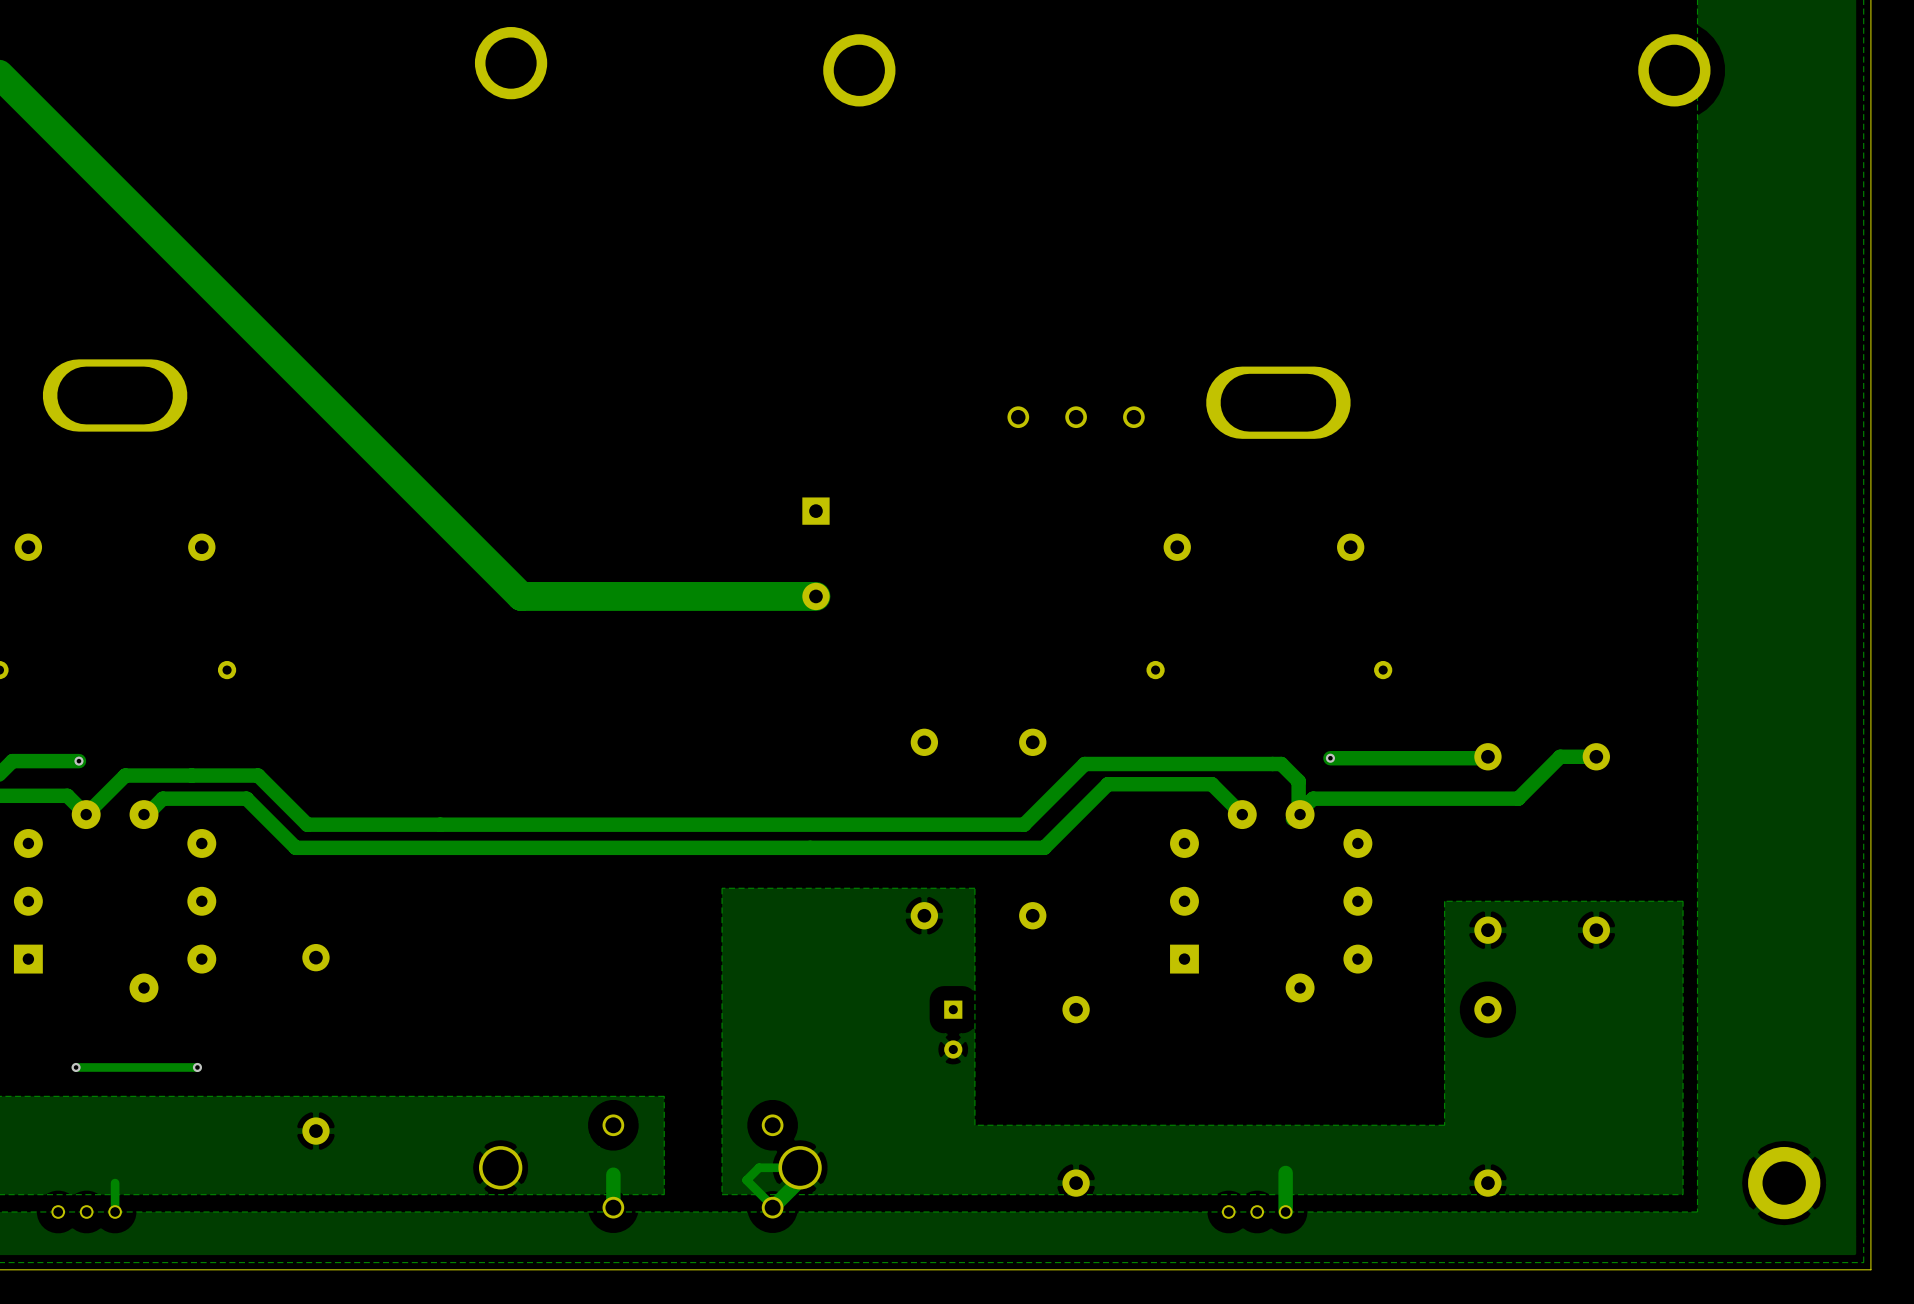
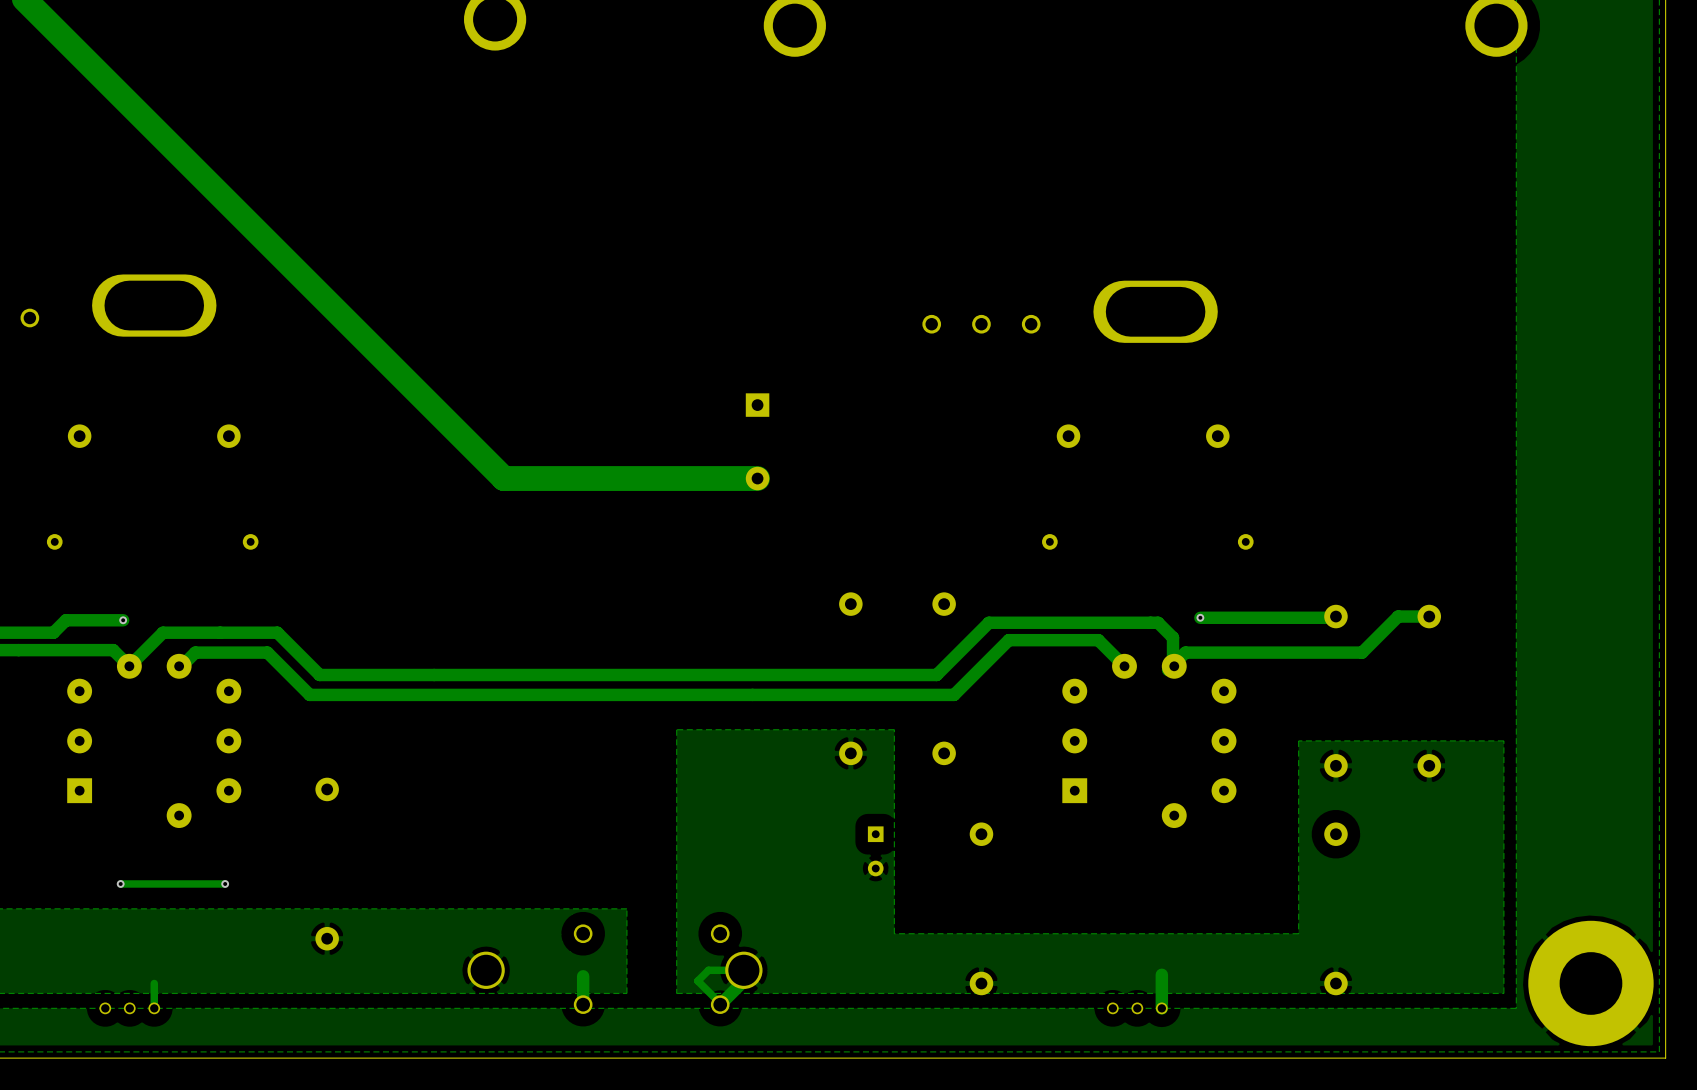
part footprint: [1748, 1146, 1821, 1220] -> [1528, 920, 1654, 1047]

